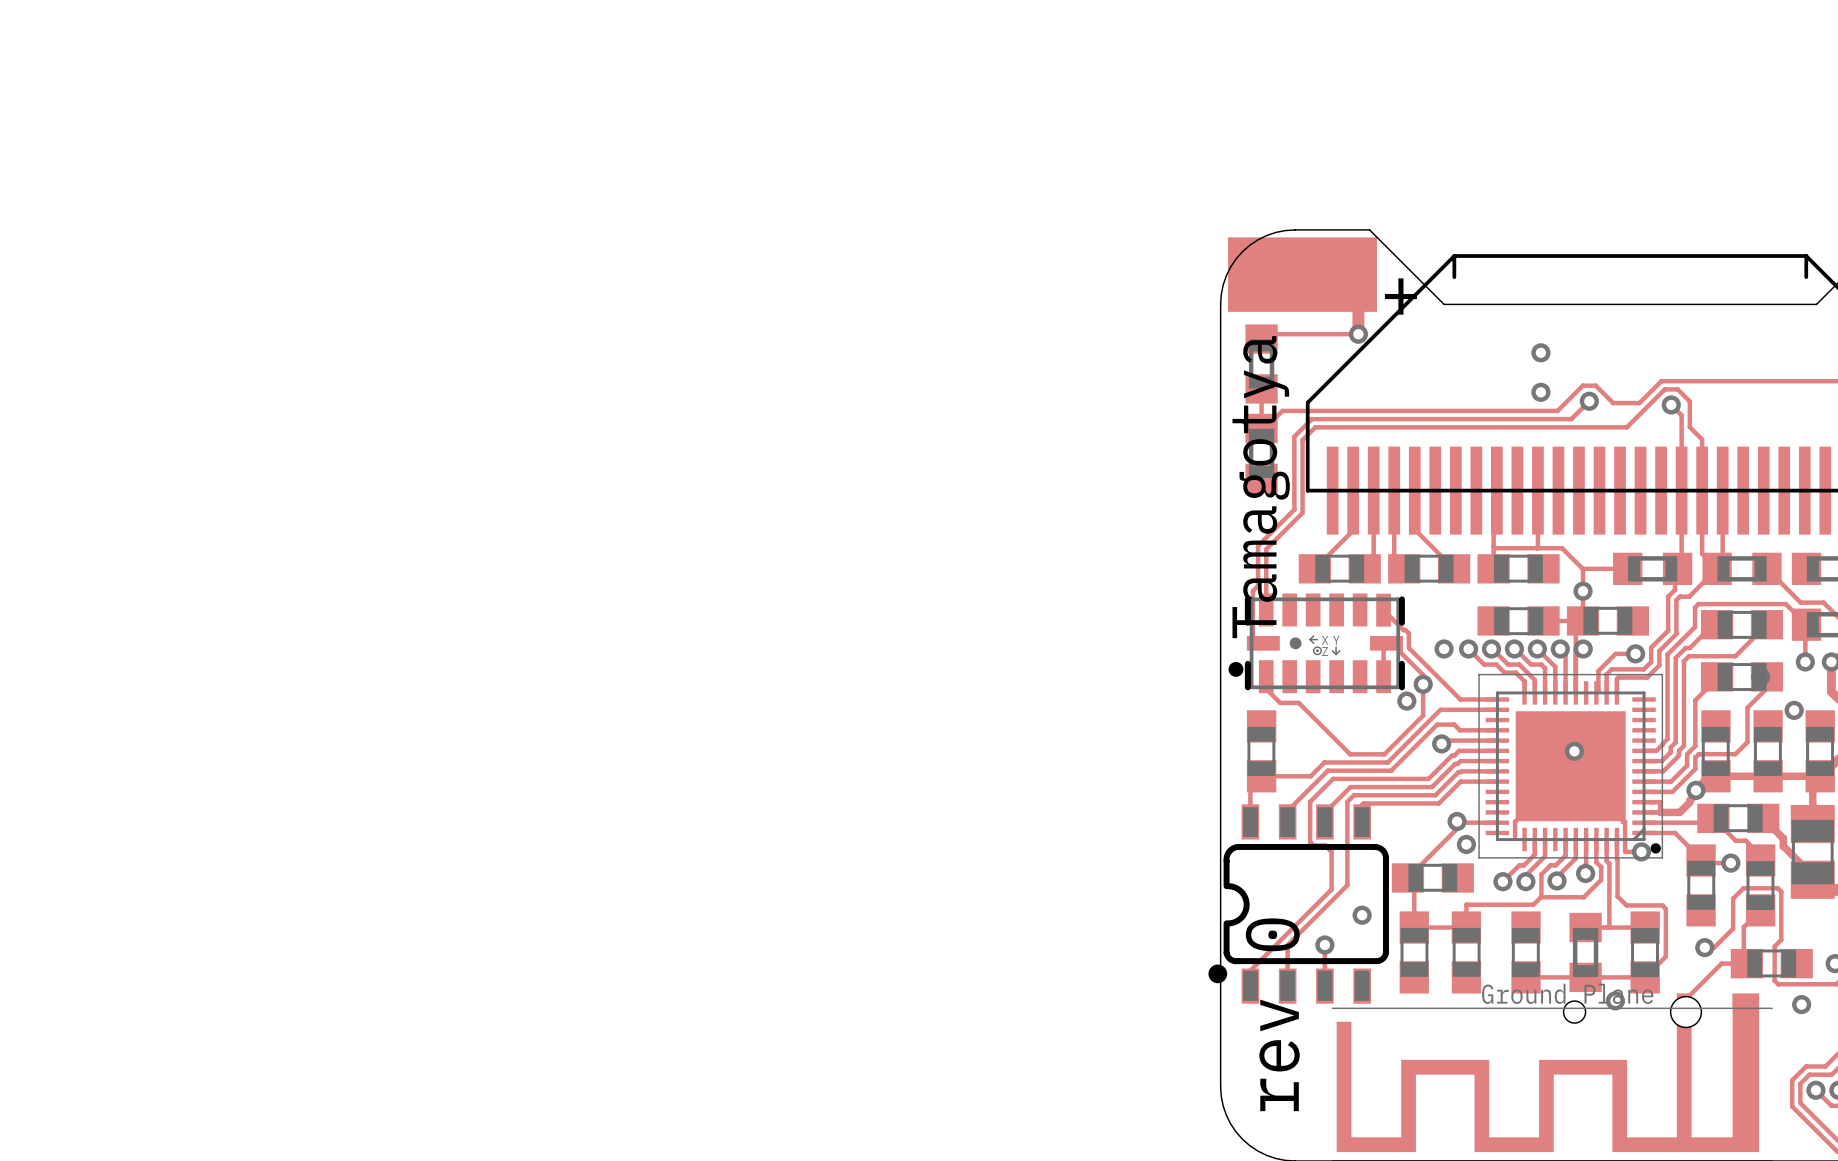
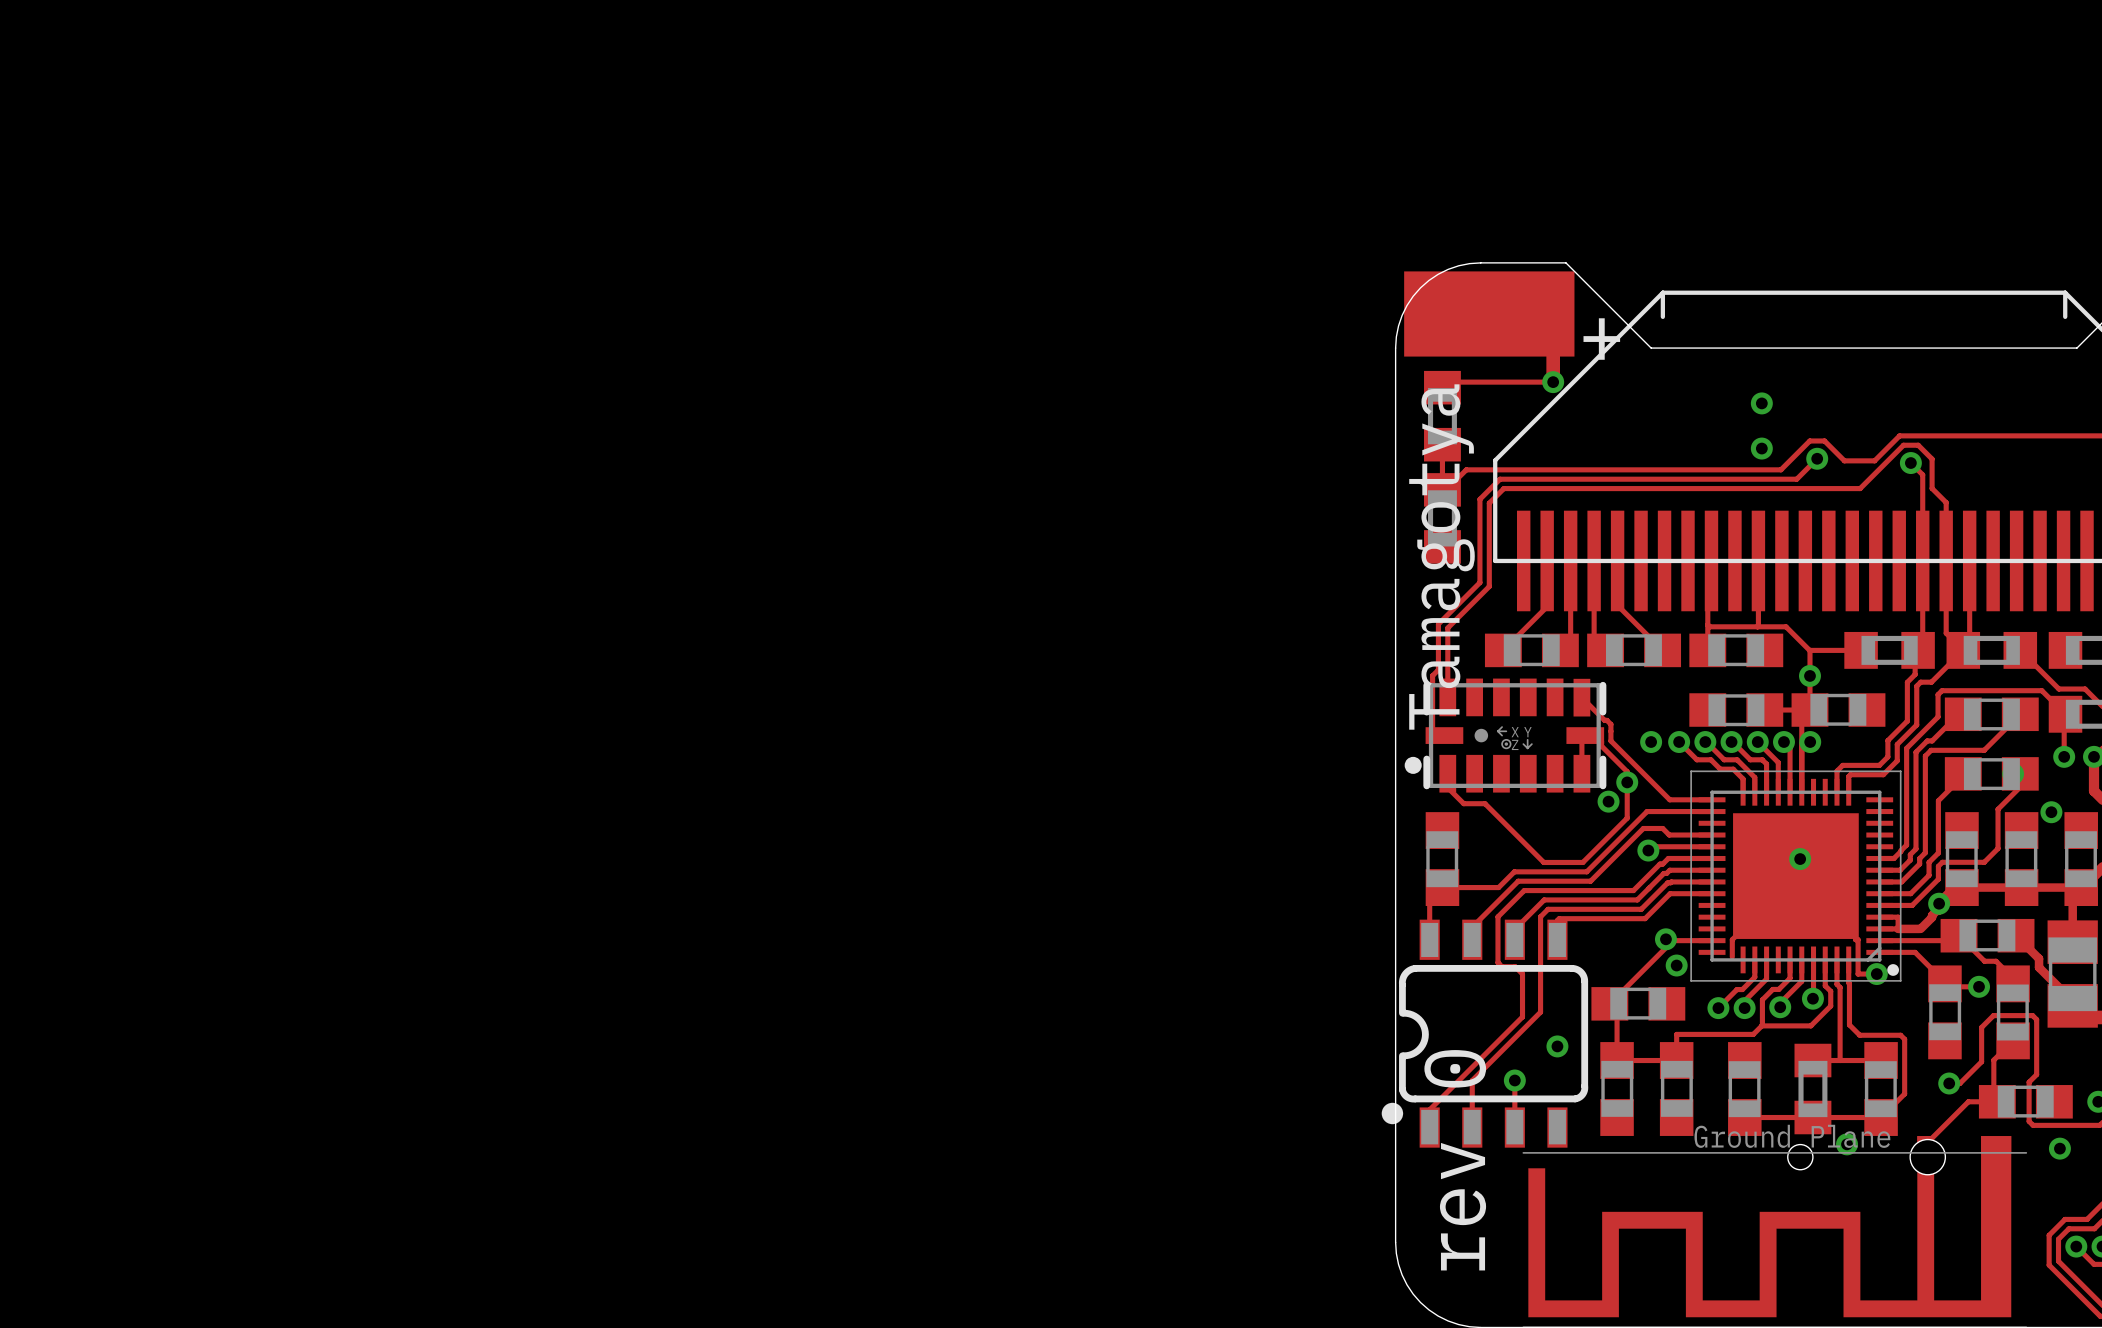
track: (1635, 653) (1615, 653) (1598, 671) (1598, 690) (1596, 692) -> none
via: (1635, 653) -> none

